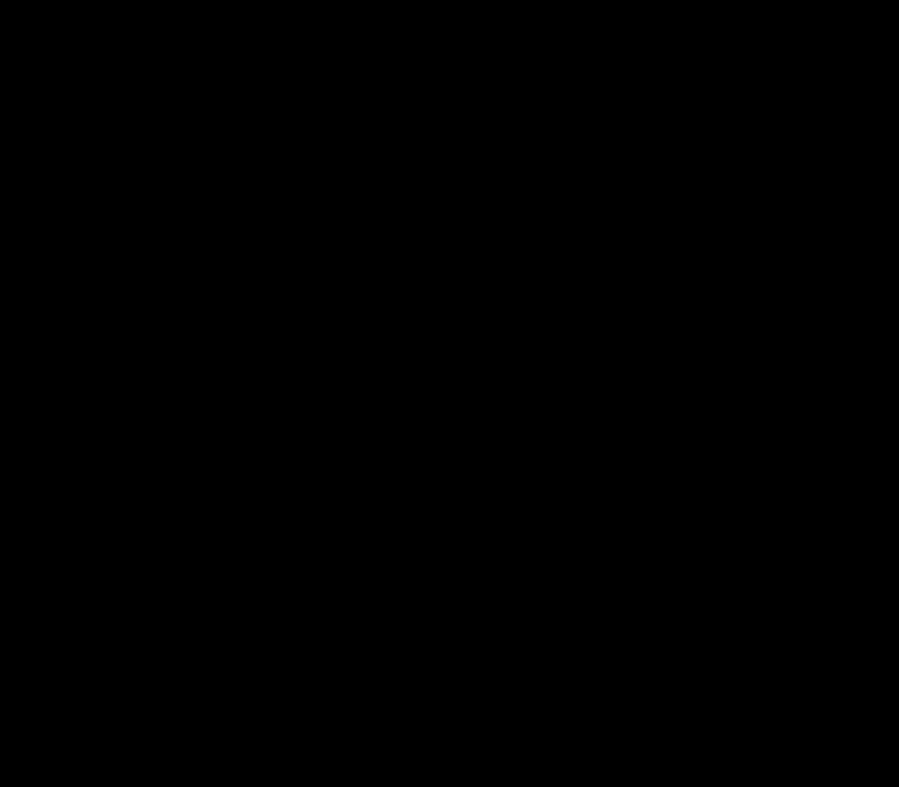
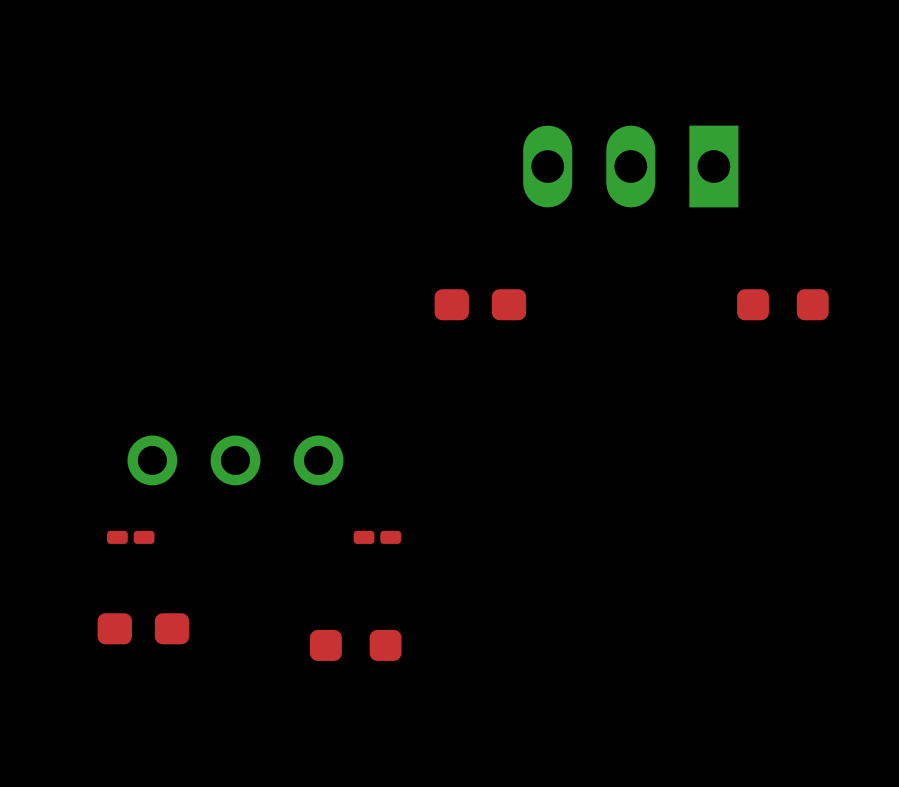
part: none -> (630, 166)
part: none -> (480, 304)
part: none -> (782, 304)
part: none -> (235, 460)
part: none -> (130, 537)
part: none -> (377, 537)
part: none -> (143, 628)
part: none -> (355, 645)

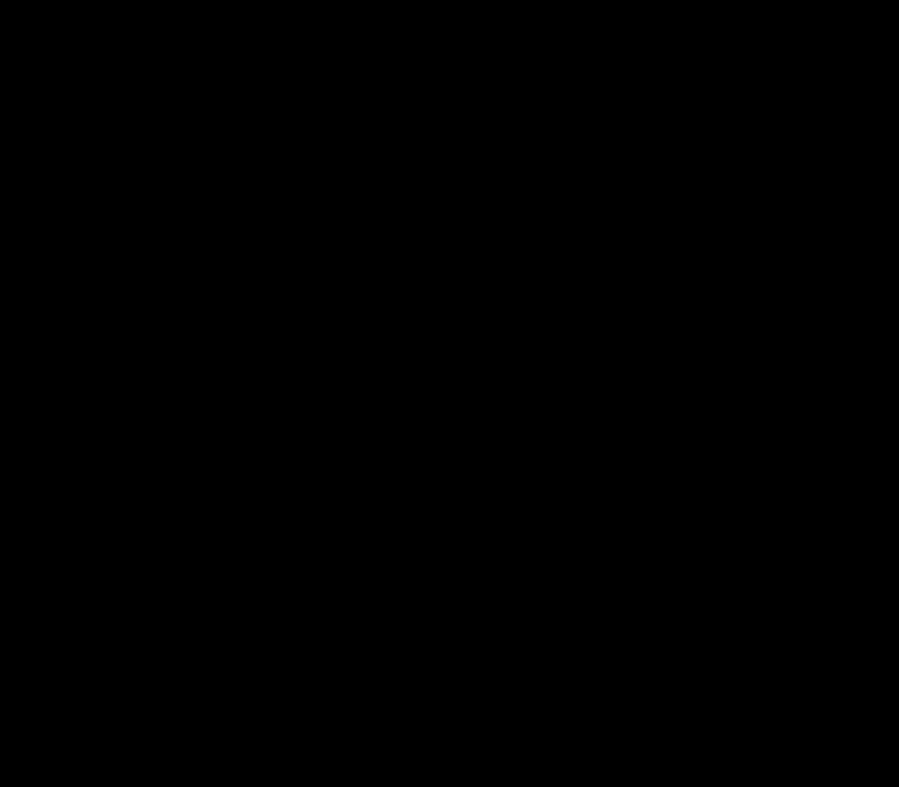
part: (630, 166) -> none
part: (480, 304) -> none
part: (782, 304) -> none
part: (235, 460) -> none
part: (130, 537) -> none
part: (377, 537) -> none
part: (143, 628) -> none
part: (355, 645) -> none

